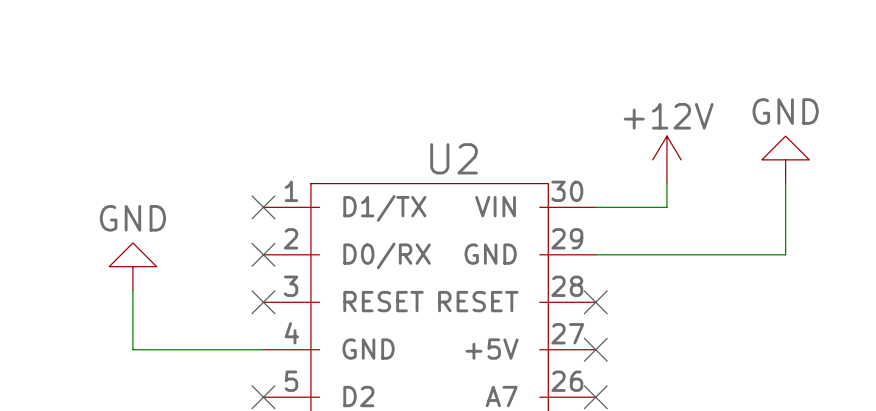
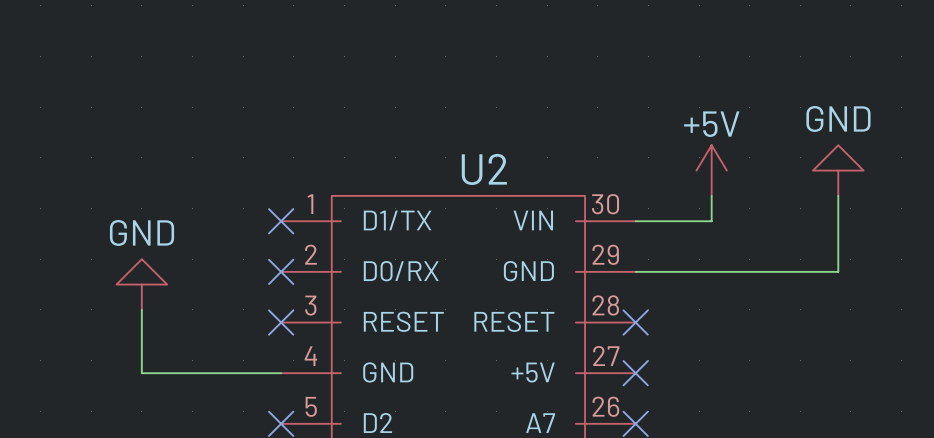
power symbol: +12V (666, 159) -> +5V (711, 170)

